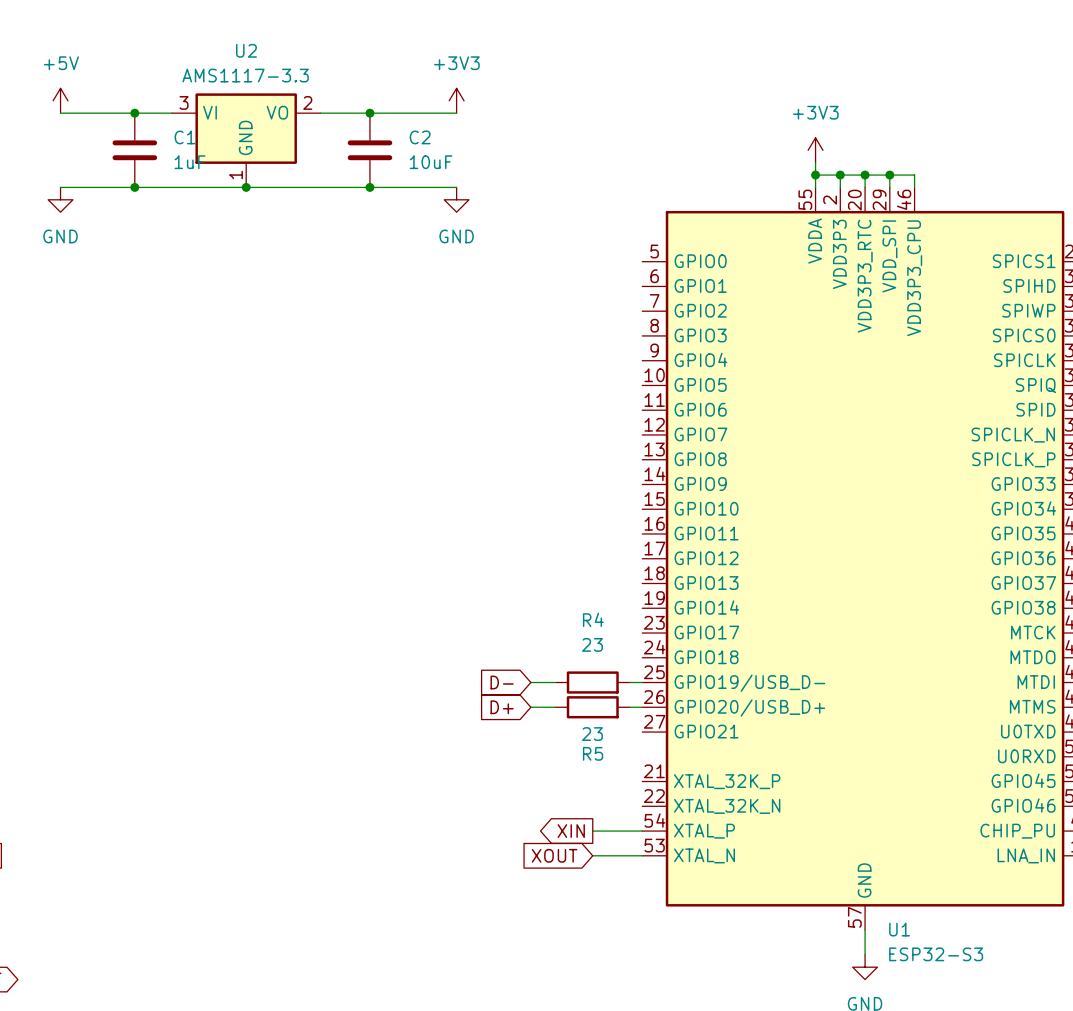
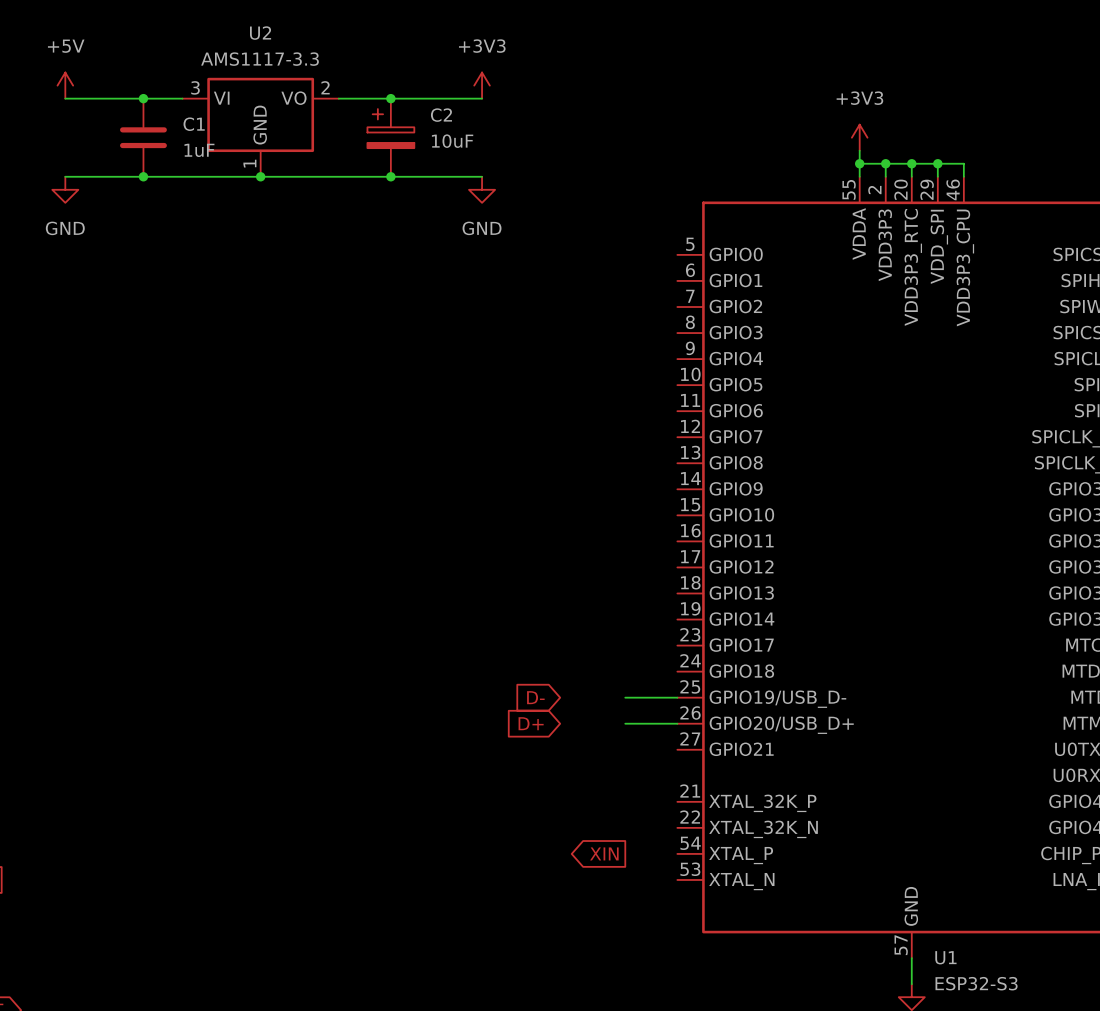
C2 symbol: [347, 113, 393, 188] -> [367, 98, 415, 177]
wire: (530, 682) (555, 682) -> none
wire: none -> (625, 697) (664, 697)
R4: 23 (592, 682) -> none
wire: (530, 707) (555, 707) -> none
wire: none -> (625, 723) (664, 723)
R5: 23 (592, 707) -> none
wire: (592, 831) (642, 831) -> none
global label: XOUT (554, 855) -> none
wire: (592, 855) (642, 855) -> none

